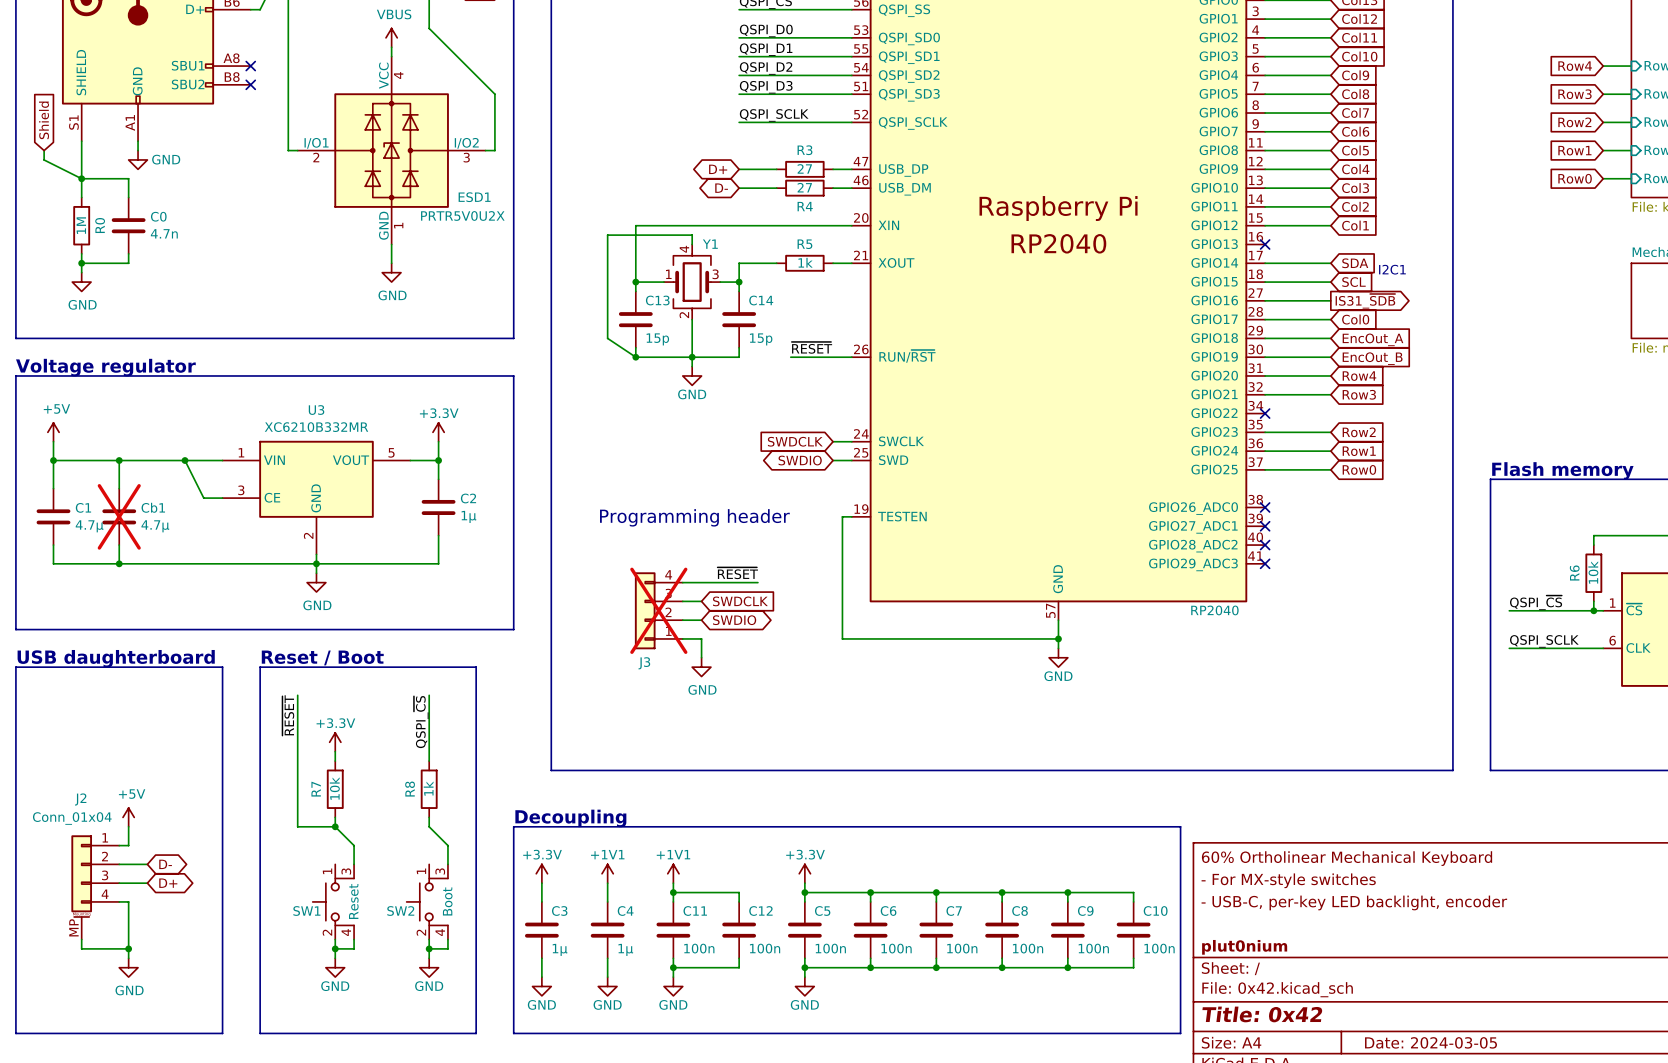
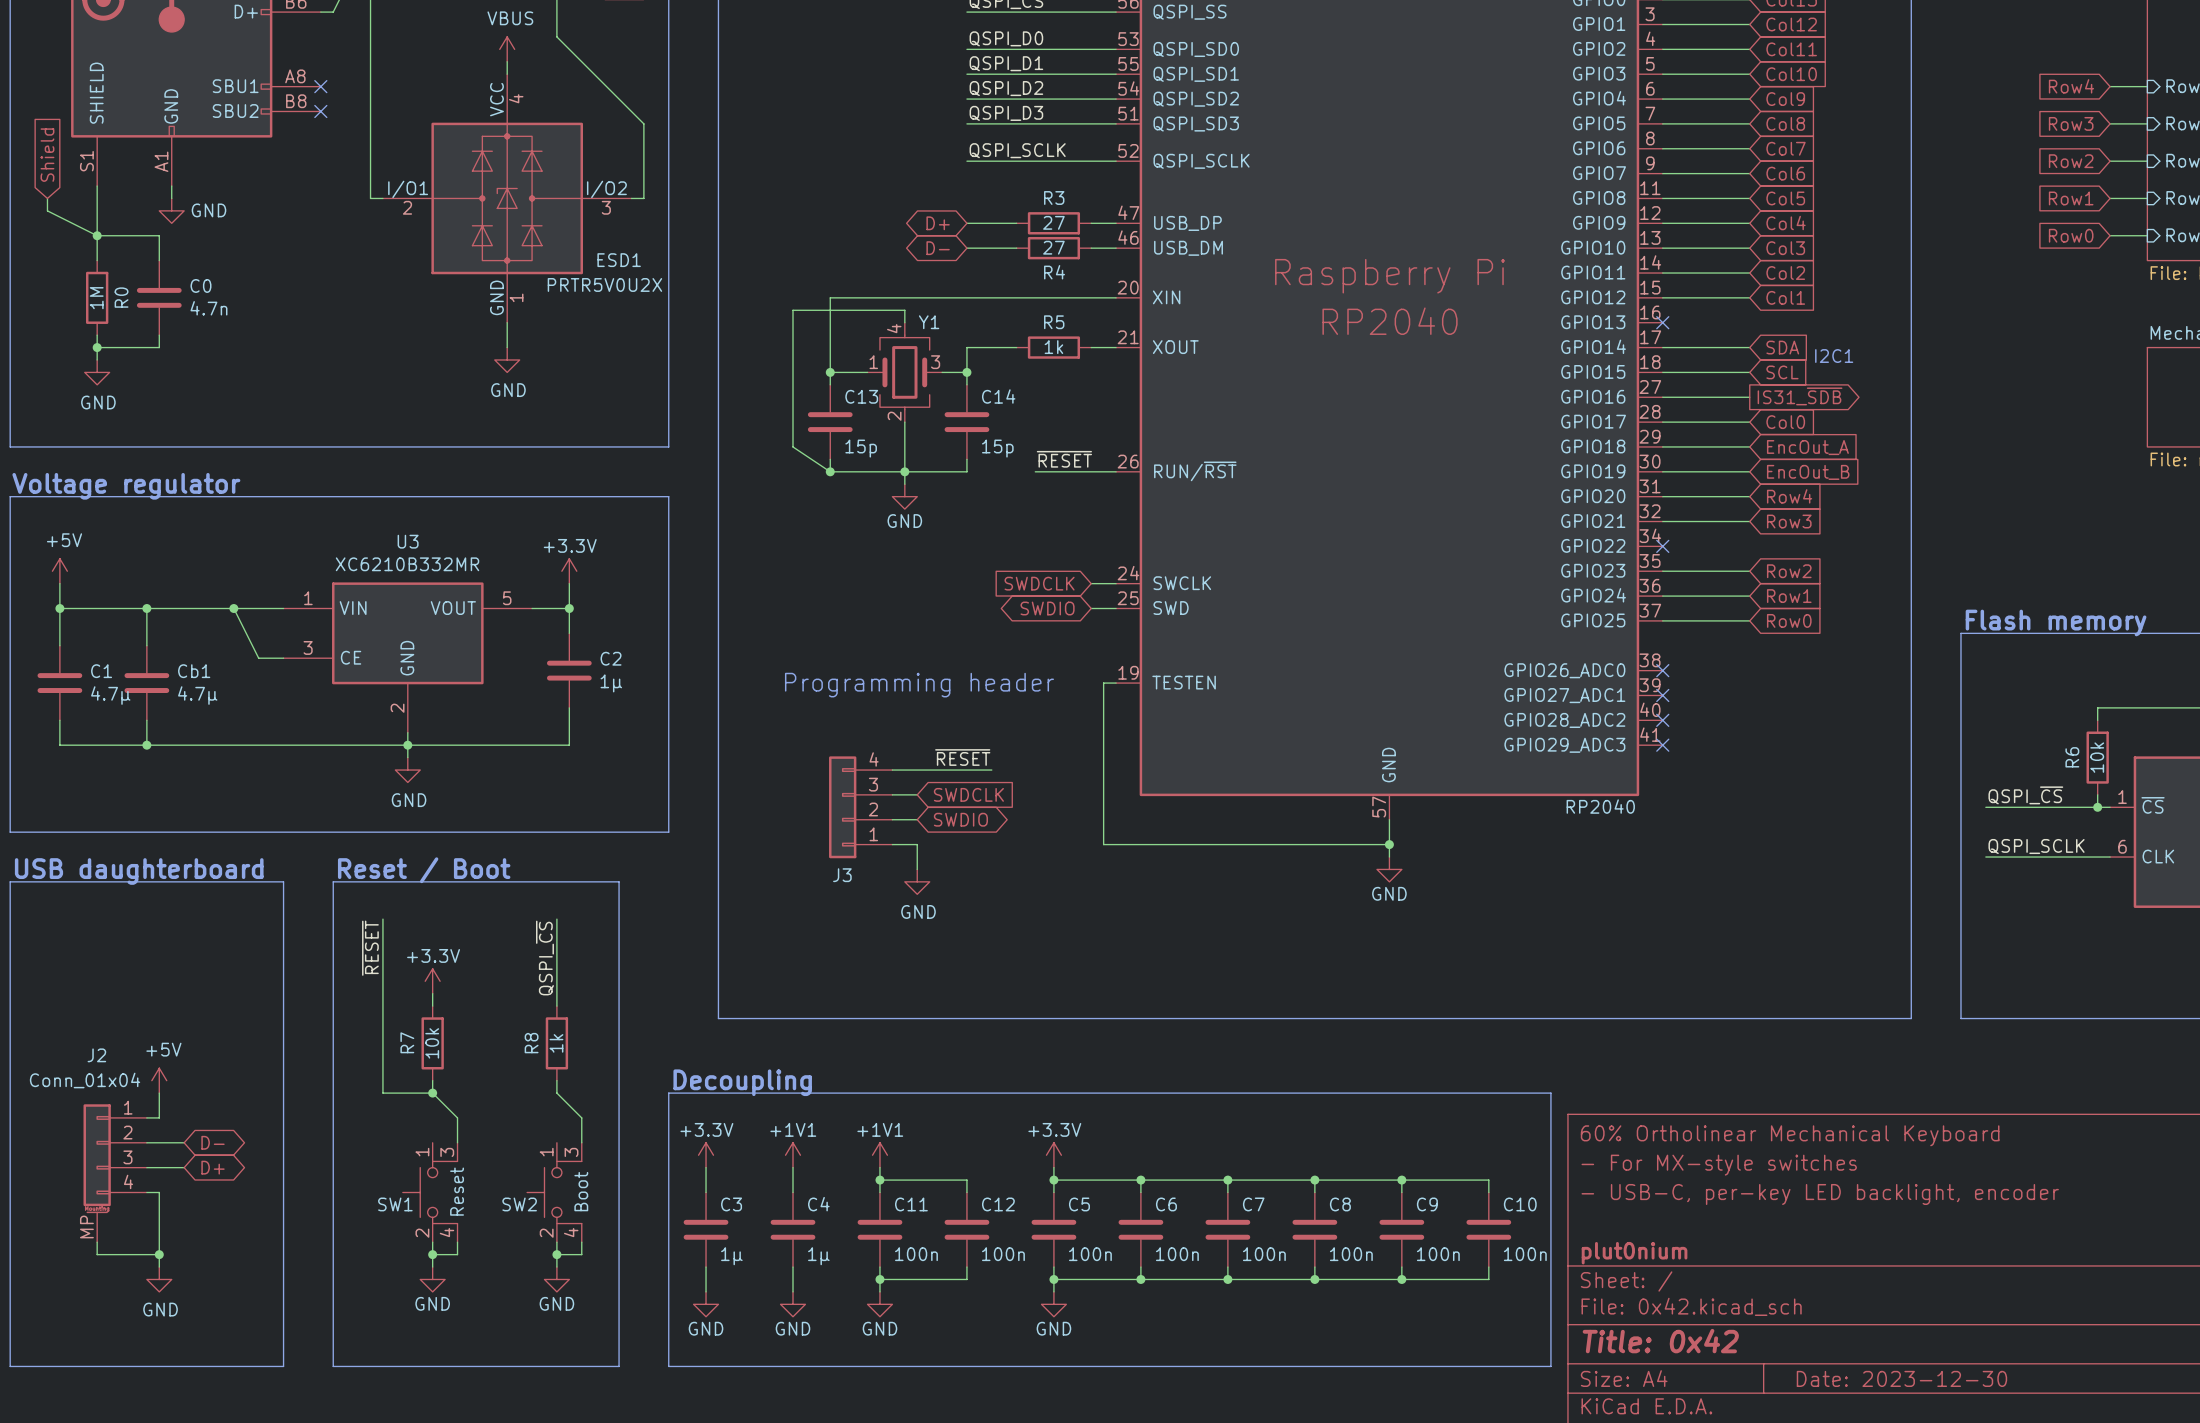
Cb1 do-not-place cross: (119, 516) -> none
J3 do-not-place cross: (658, 610) -> none
title block: Date: 2024-03-05 (1430, 1042) -> Date: 2023-12-30 (1901, 1378)

